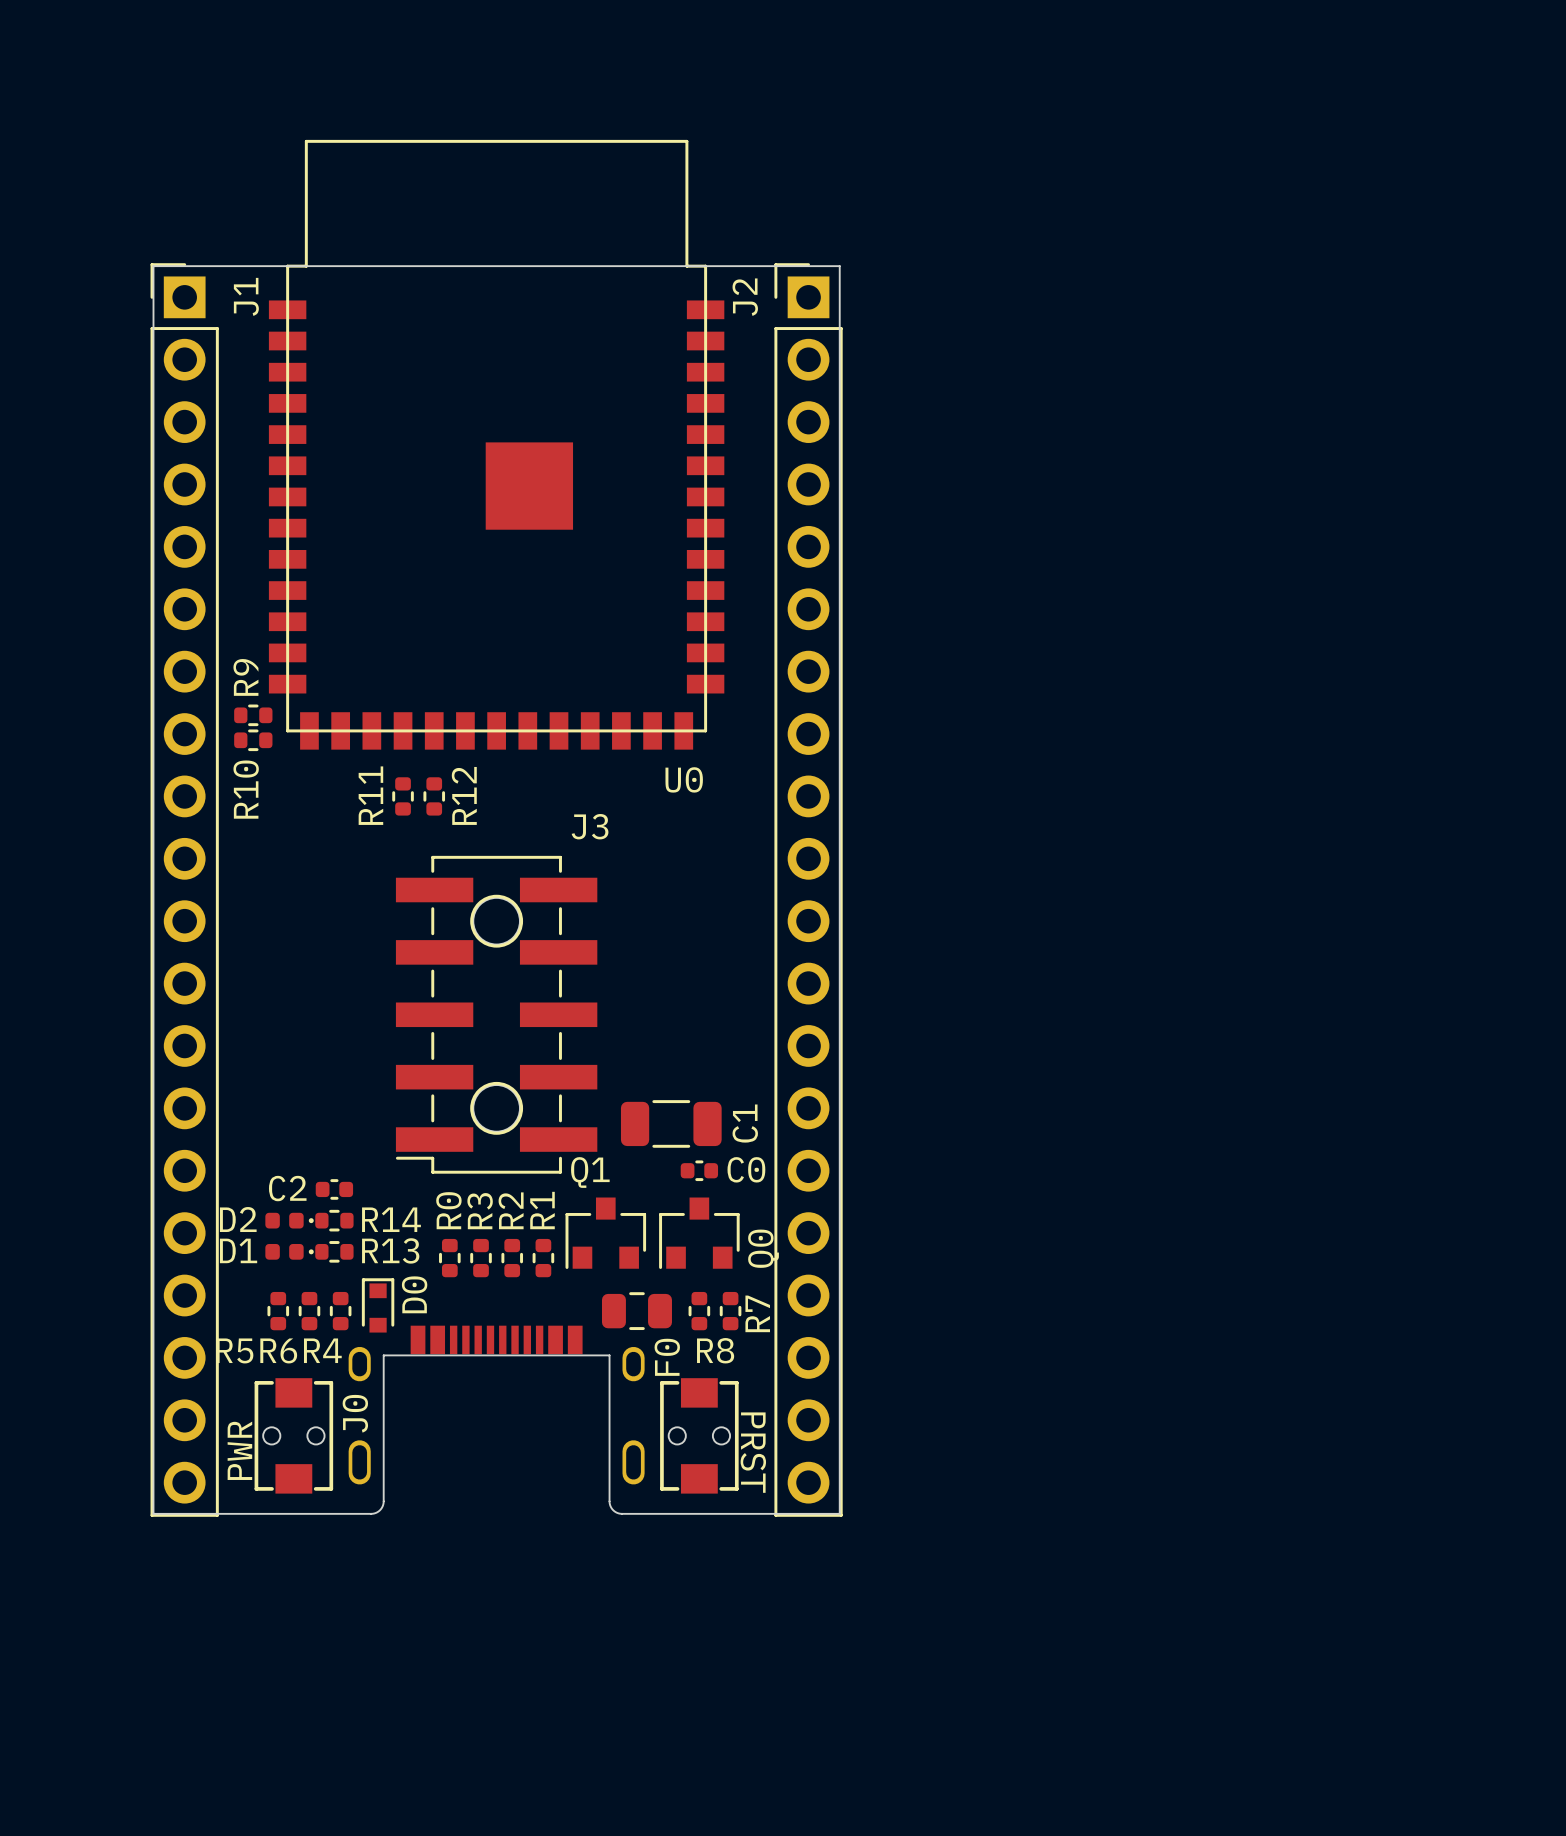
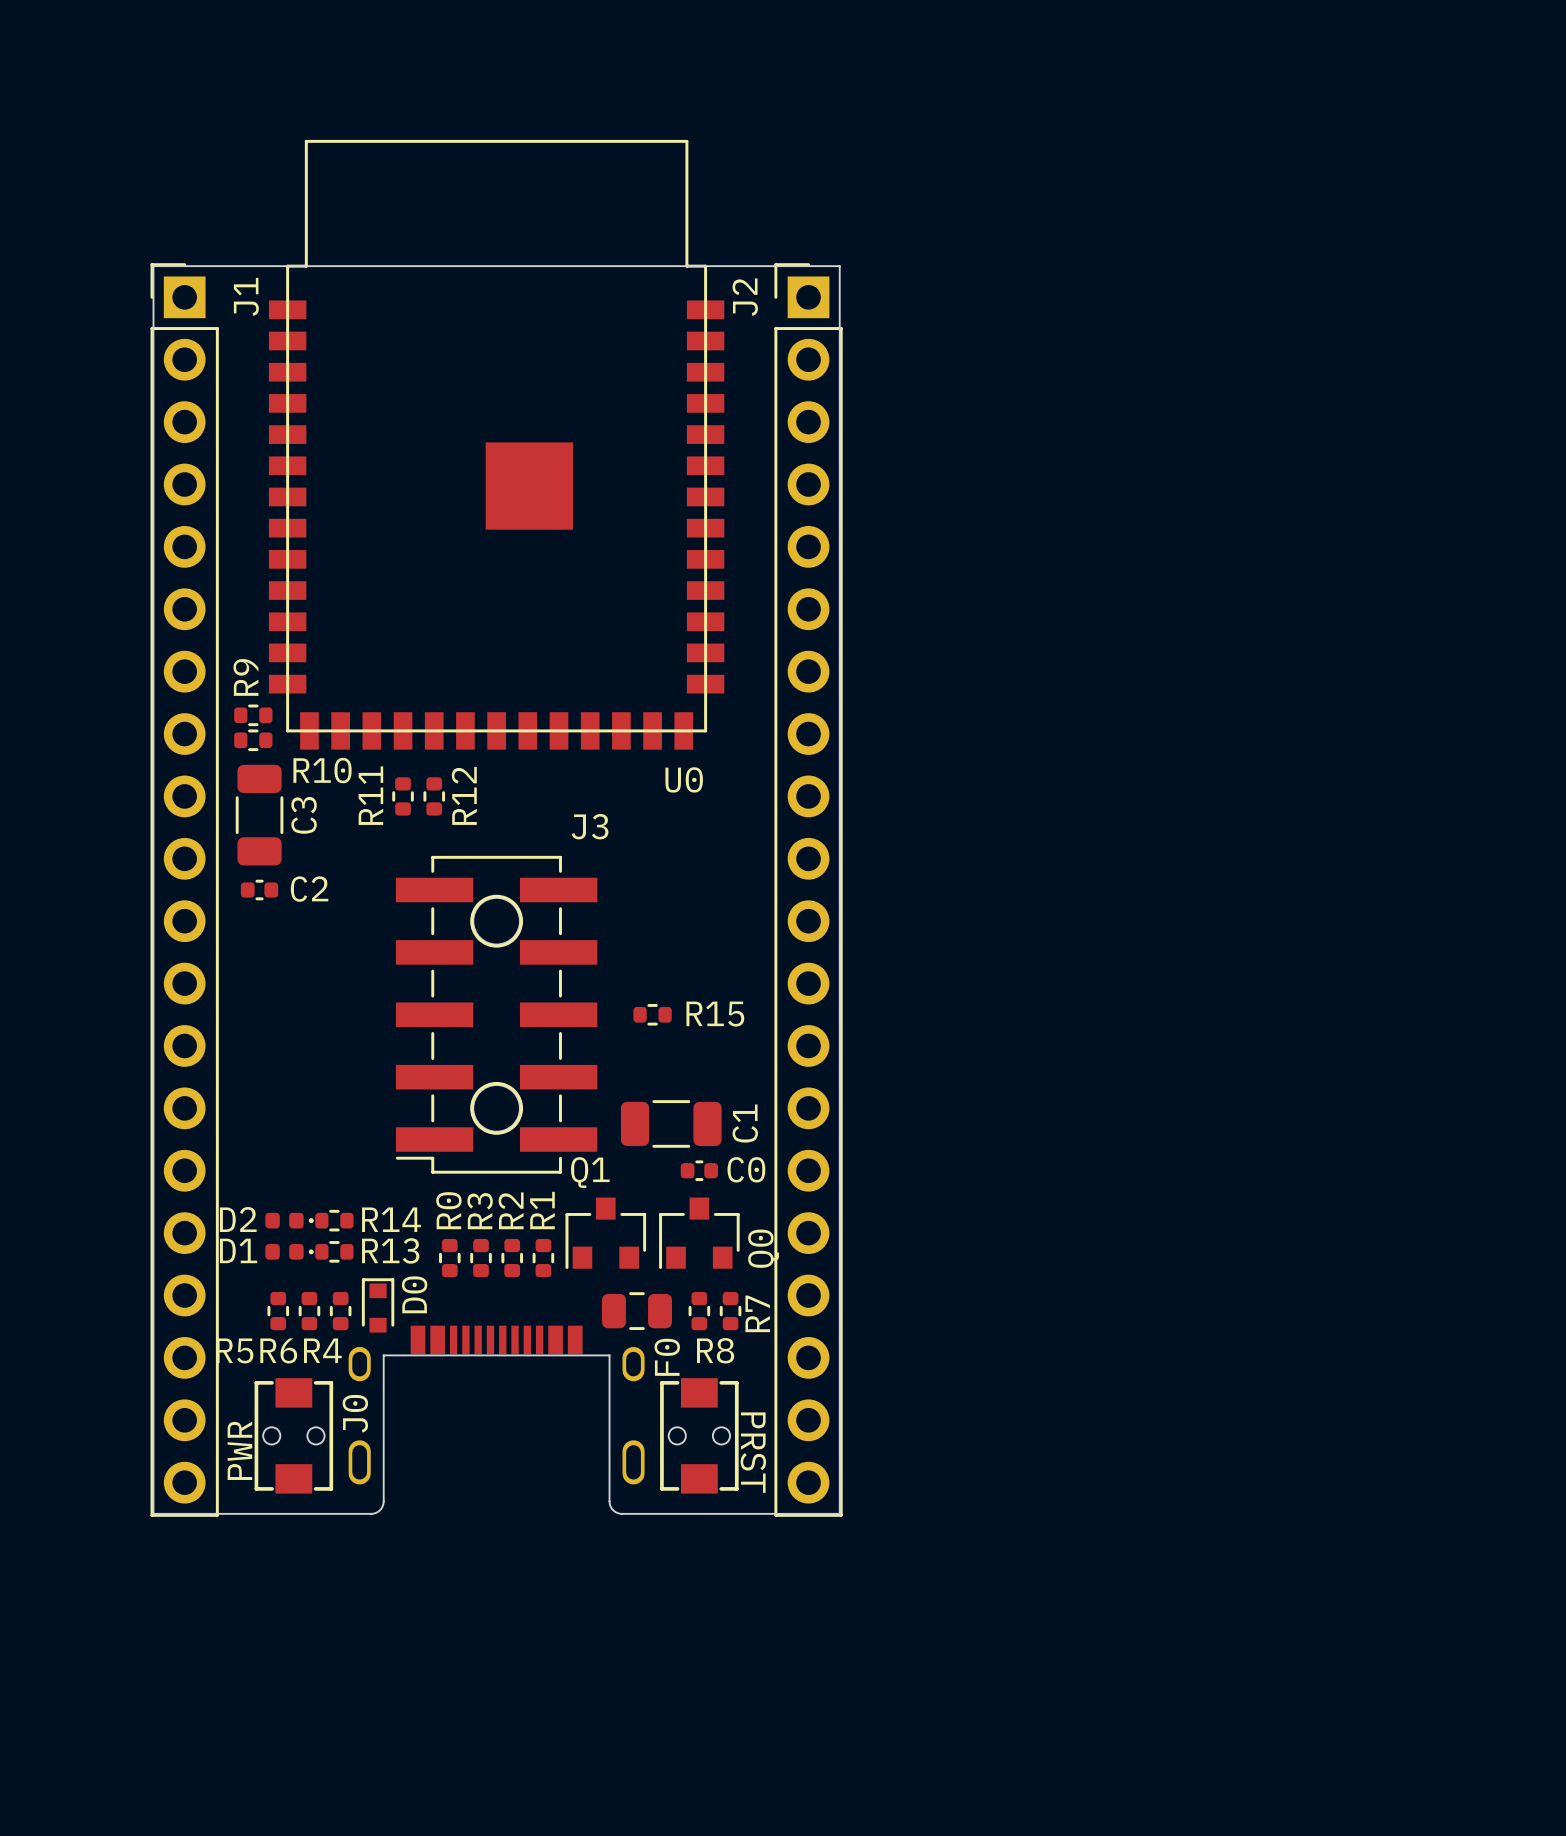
R10 name rotation: 0° (246, 789) -> 90° clockwise (322, 770)
C3: none -> (259, 815)
R15: none -> (652, 1014)
C2 name position: C2 (287, 1188) -> C2 (309, 889)
C2 position: (334, 1189) -> (259, 890)

